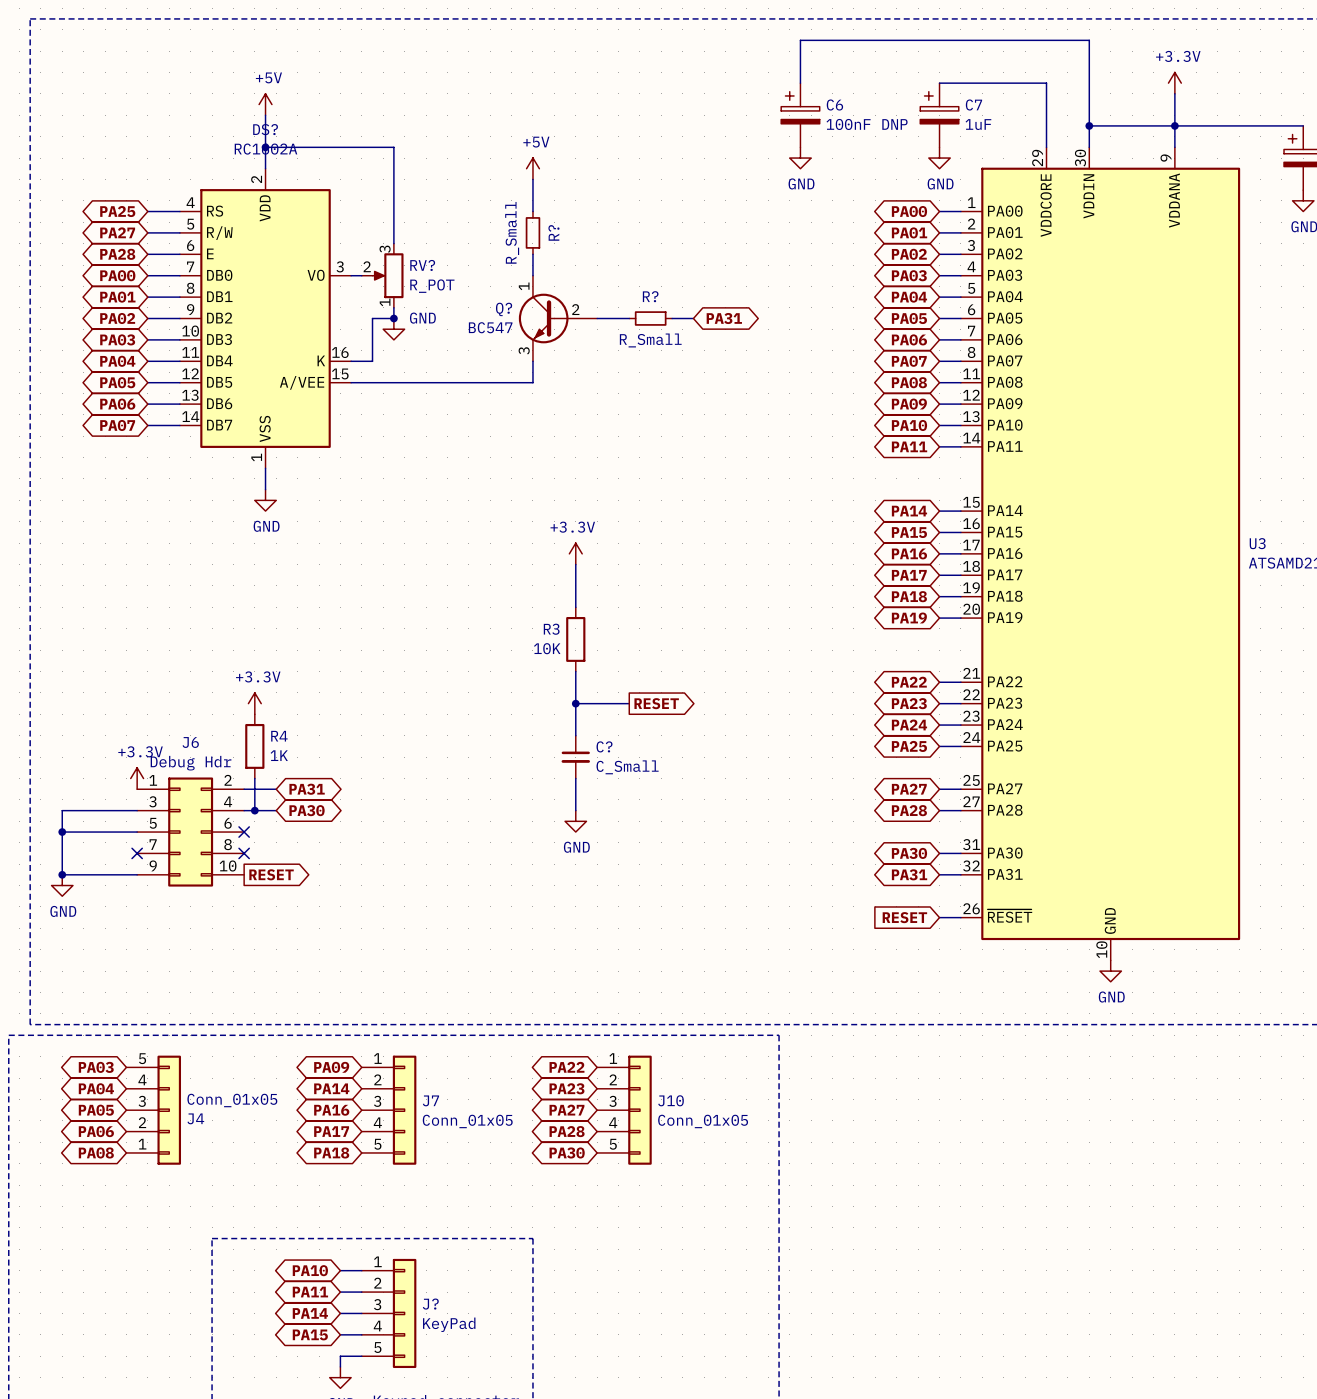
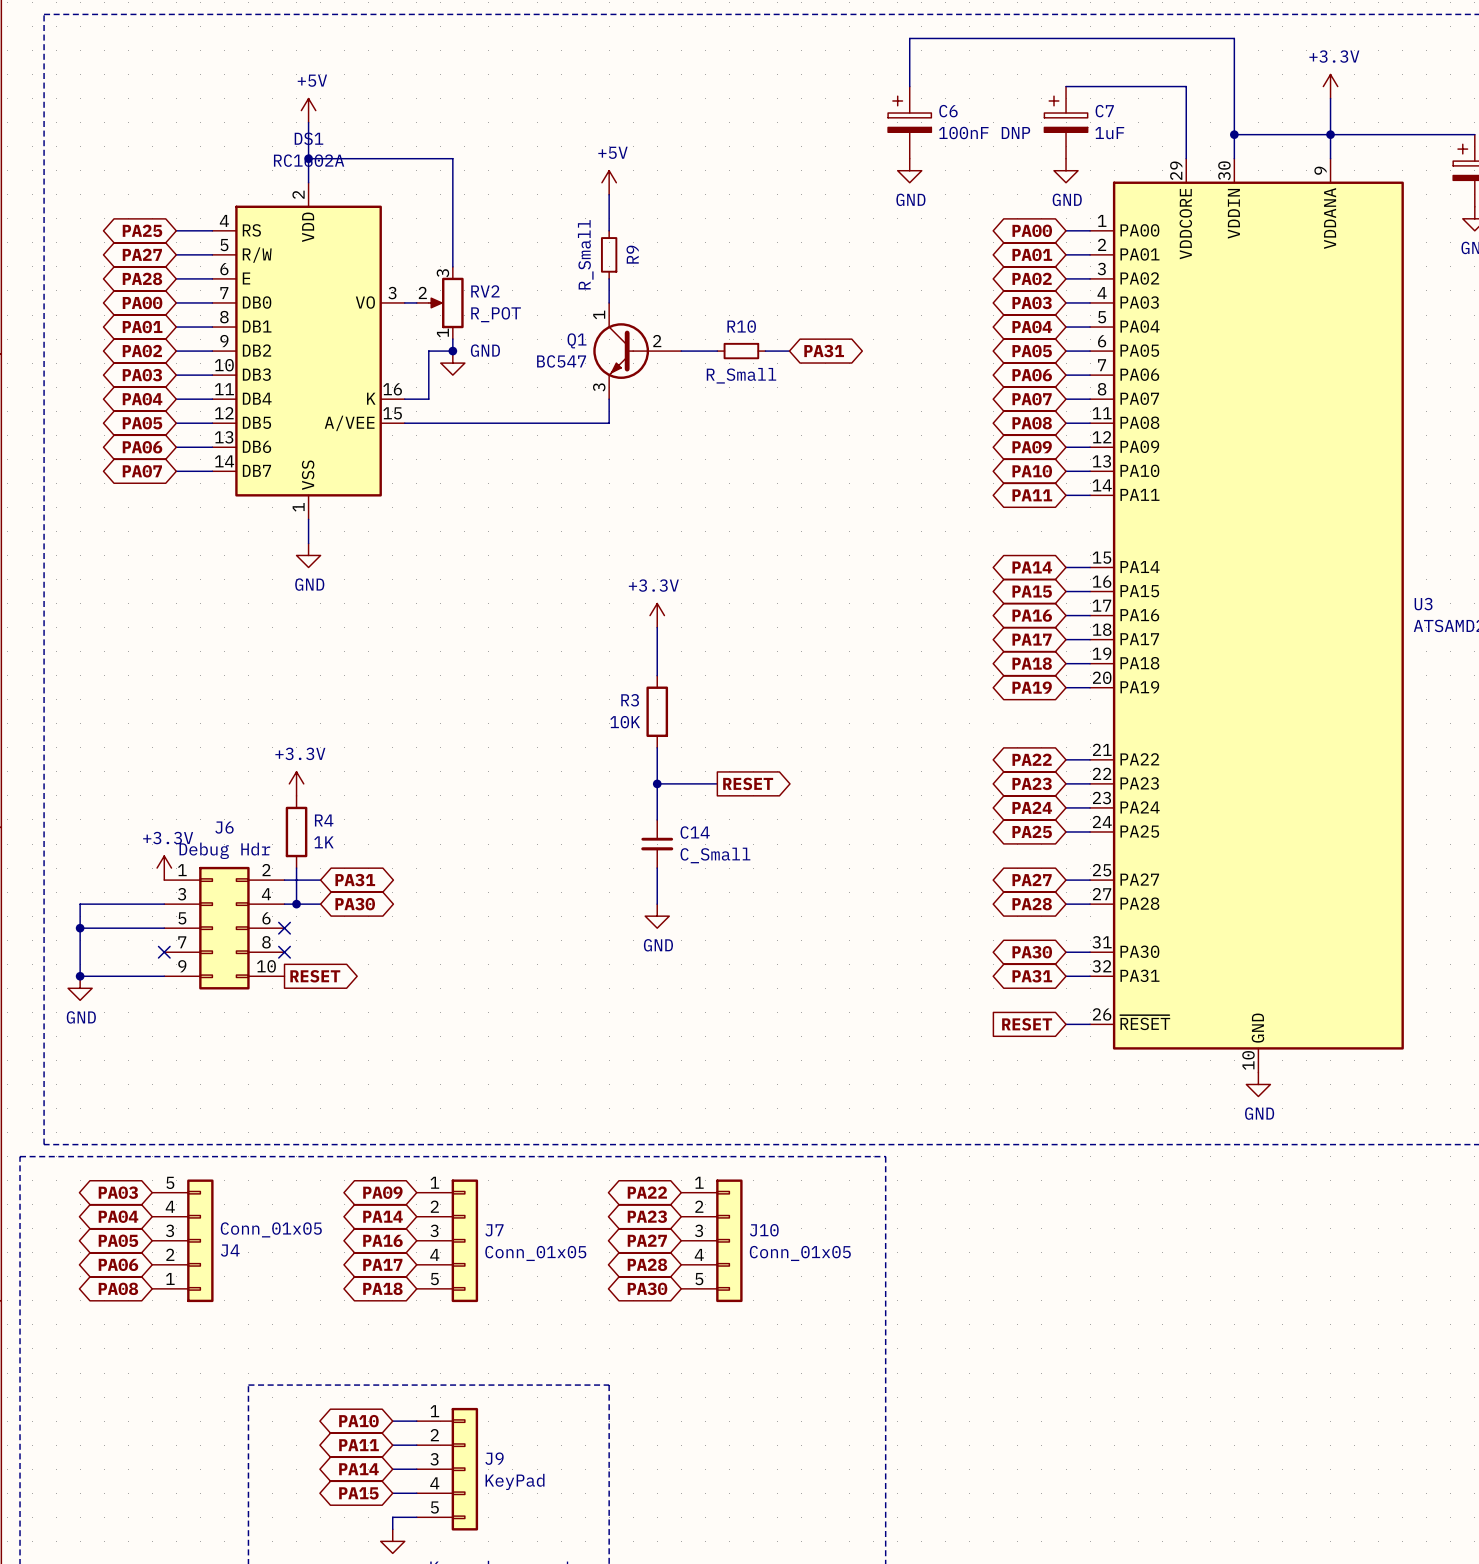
DS? name: DS? (265, 129) -> DS1 (308, 138)
R? name: R? (553, 232) -> R9 (632, 254)
RV? name: RV? (422, 265) -> RV2 (485, 291)
R? name: R? (650, 296) -> R10 (741, 326)
Q? name: Q? (504, 309) -> Q1 (577, 340)
C? name: C? (604, 746) -> C14 (695, 832)
J? name: J? (430, 1304) -> J9 (494, 1458)

